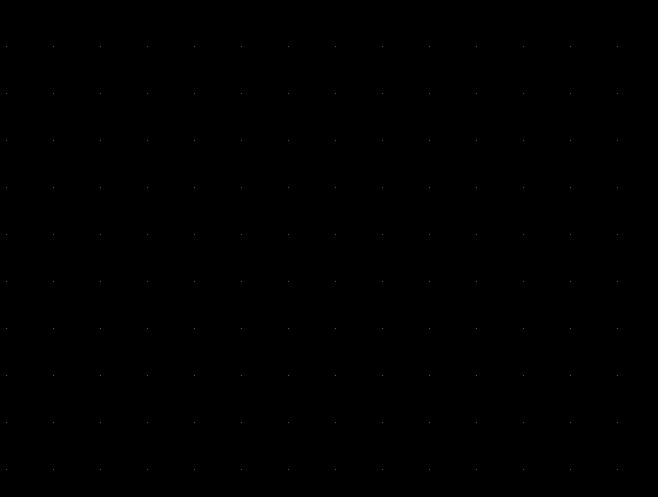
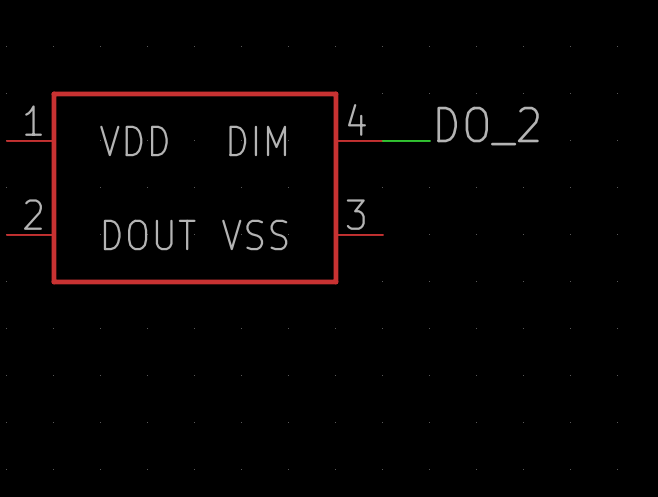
label: none -> DO_2 (488, 126)
wire: none -> (382, 140) (429, 140)
part: none -> (194, 187)

